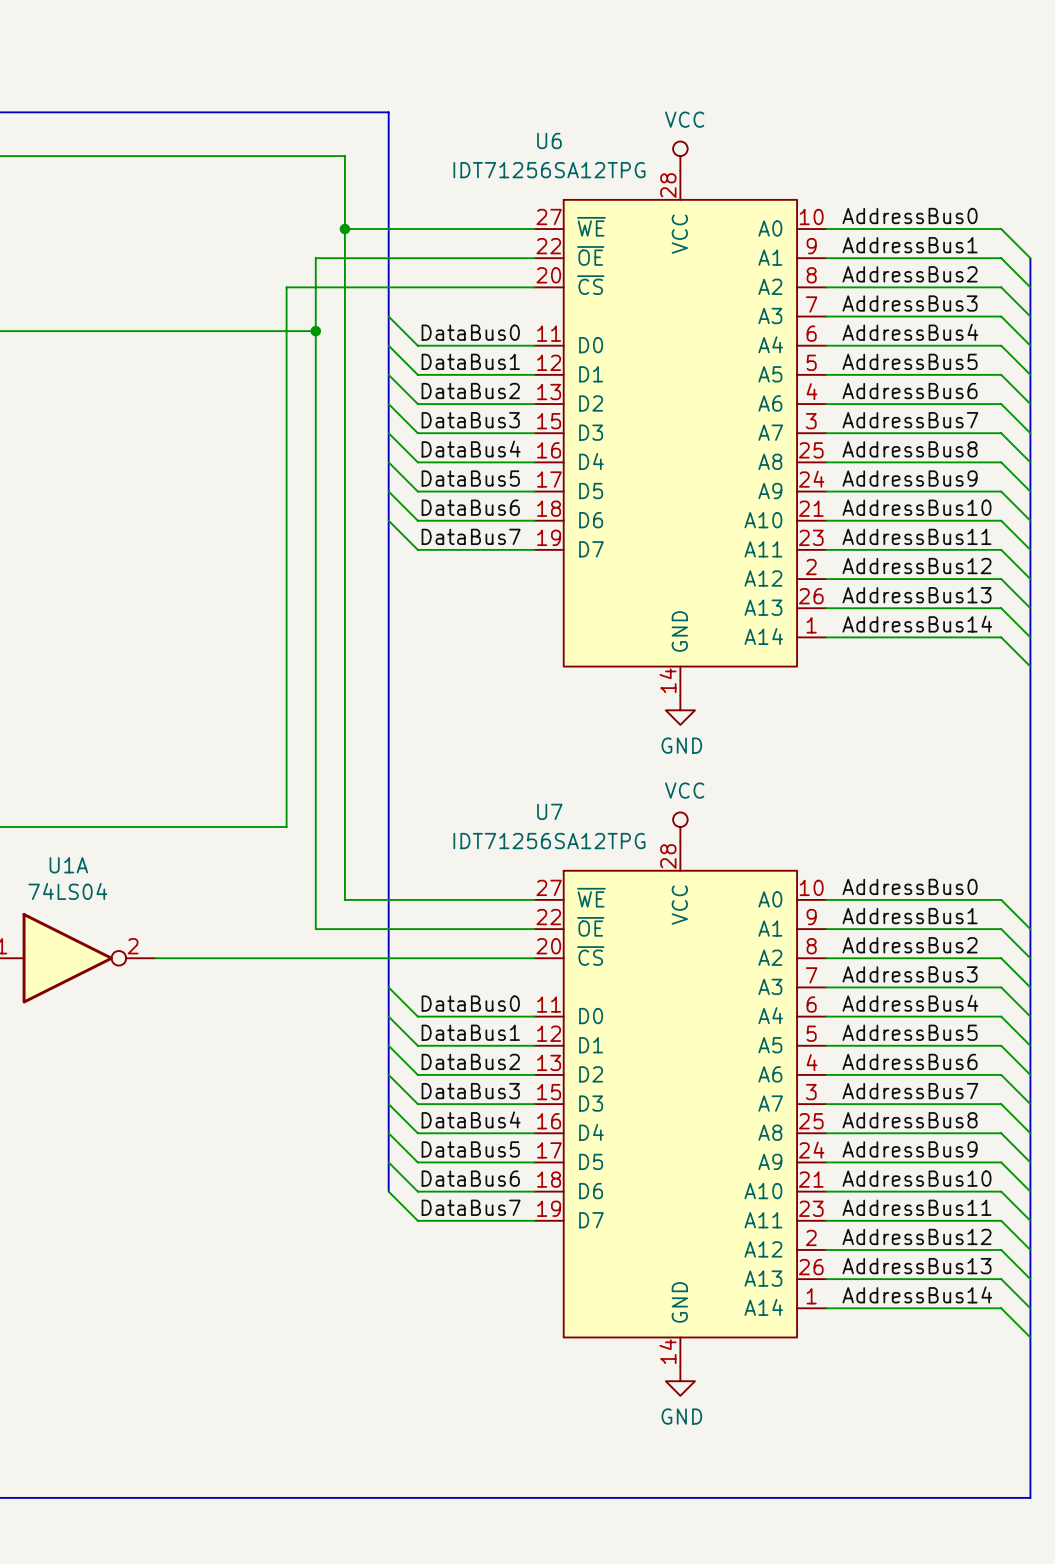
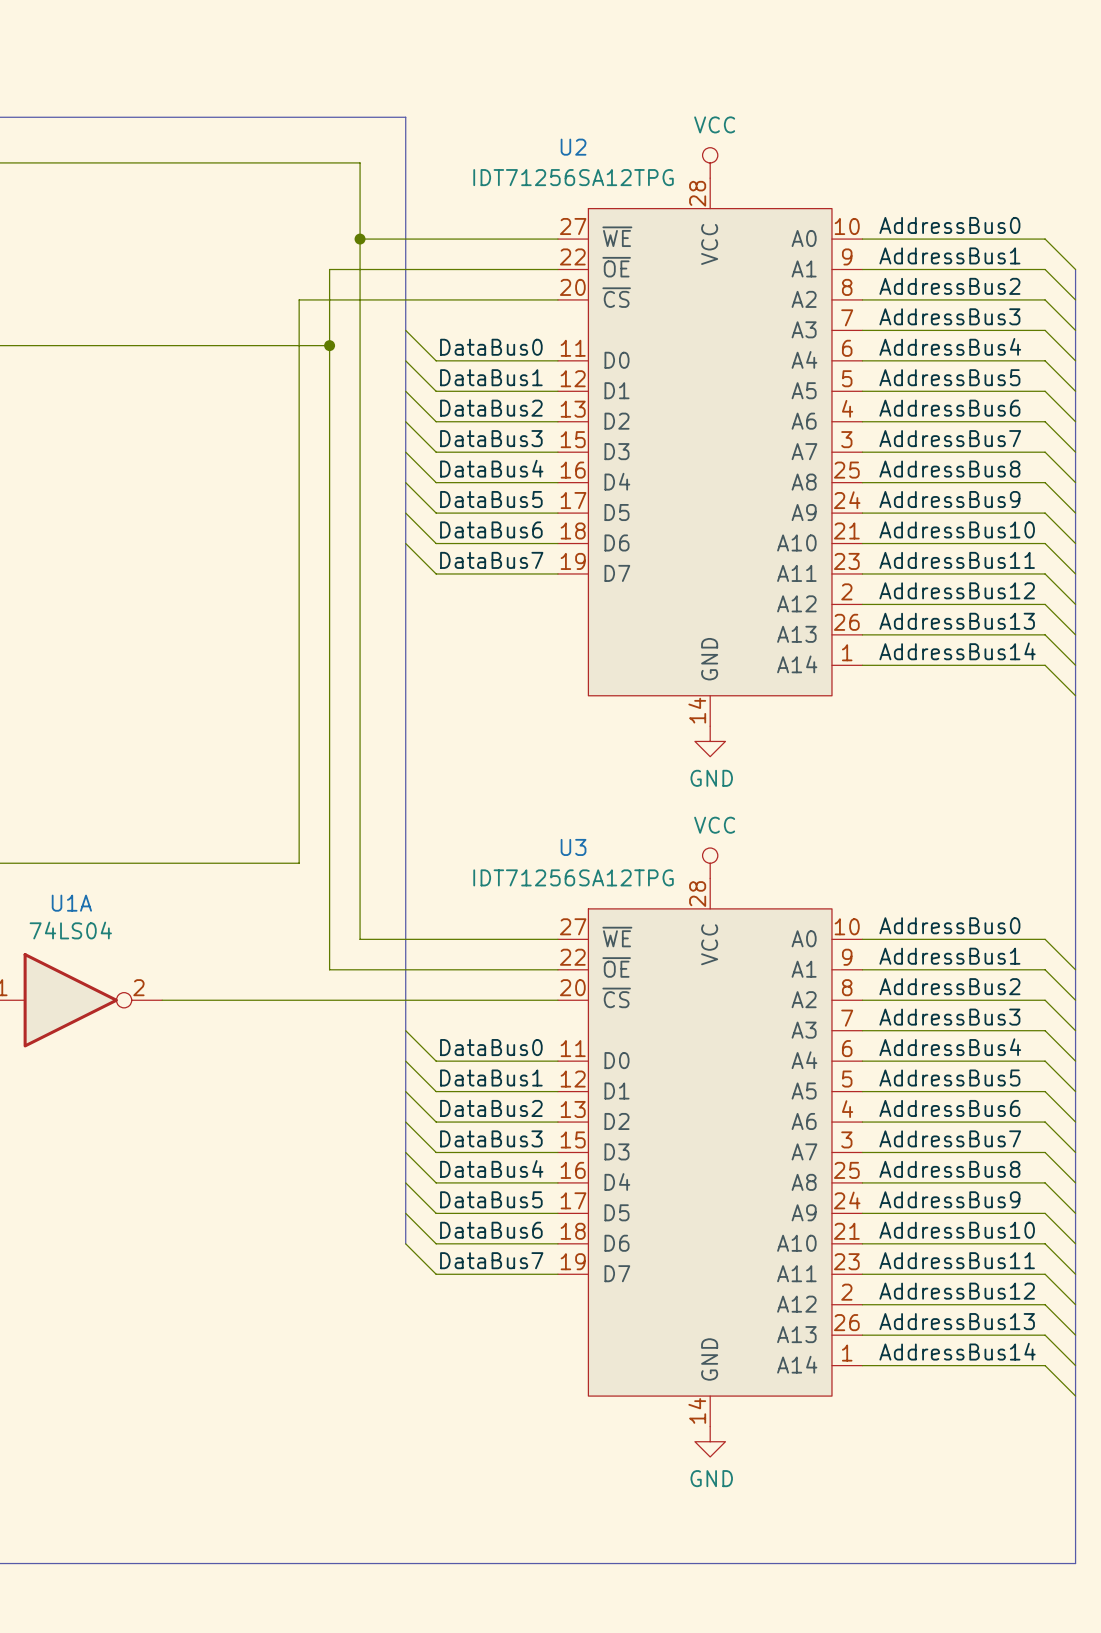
U6 name: U6 (549, 140) -> U2 (573, 147)
U7 name: U7 (549, 811) -> U3 (573, 847)

